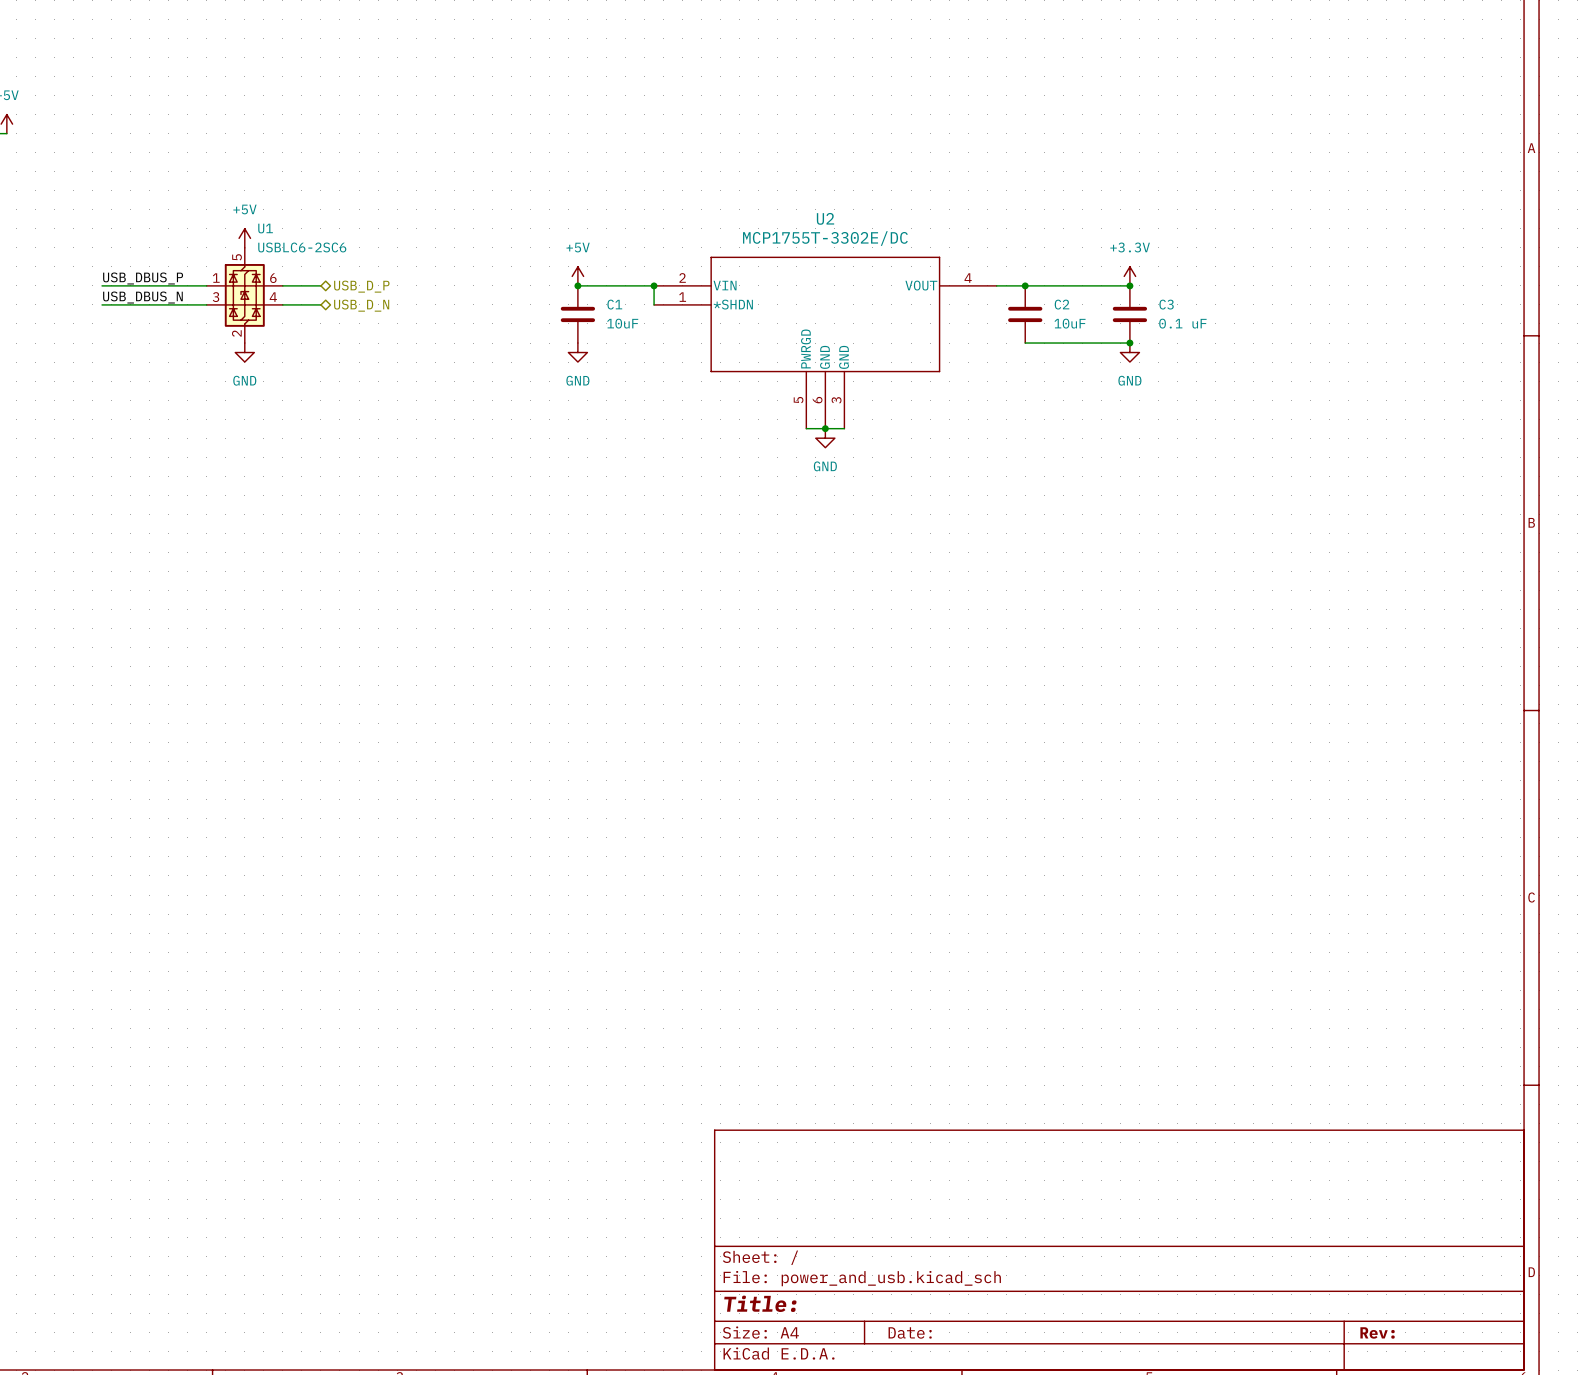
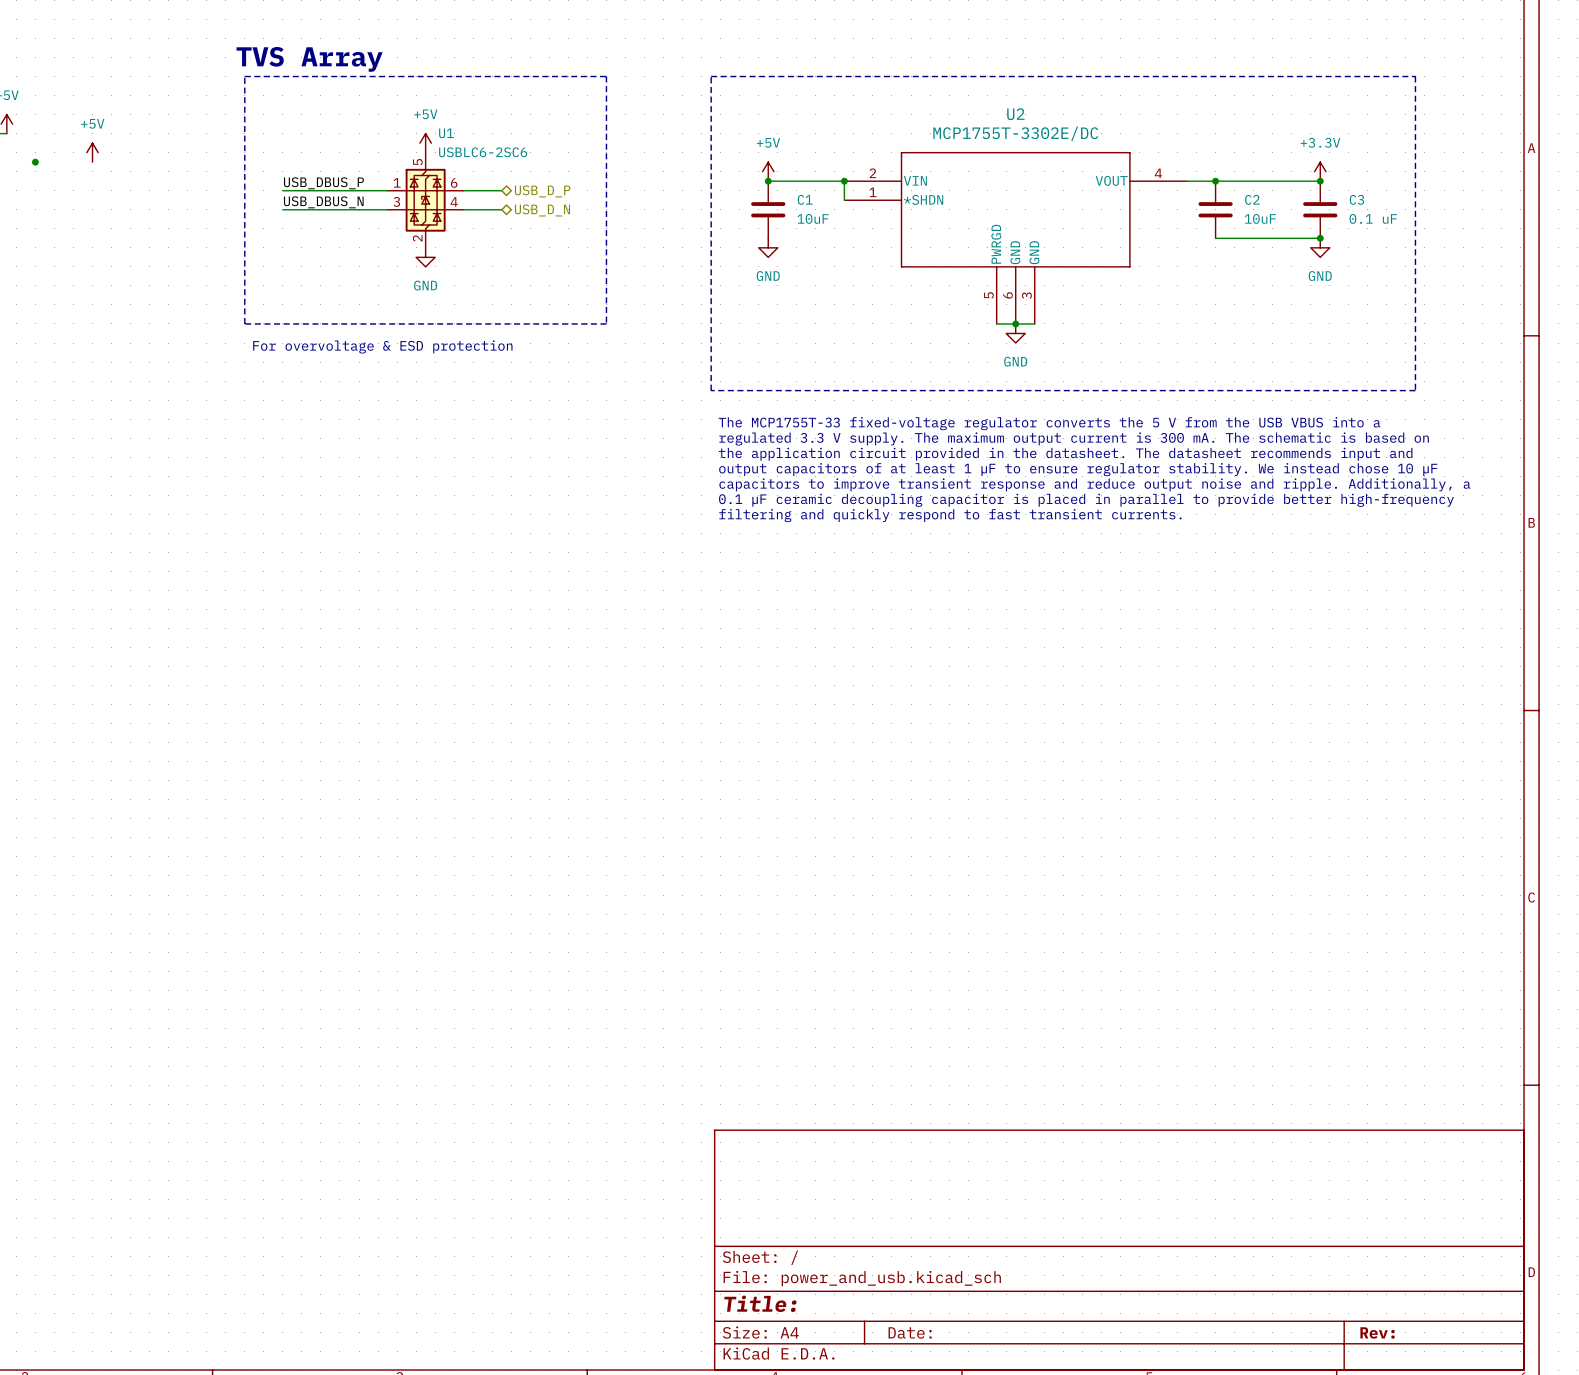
text: none -> TVS Array (309, 59)
line: none -> (244, 76) (606, 76) (606, 323) (244, 323) (244, 76)
line: none -> (711, 76) (1415, 76) (1415, 390) (711, 390) (711, 76)
power symbol: none -> +5V (425, 143)
power symbol: none -> +5V (92, 152)
junction: none -> (35, 162)
power symbol: none -> +5V (768, 171)
power symbol: none -> +3.3V (1320, 171)
wire: none -> (768, 181) (844, 181) (844, 200)
junction: none -> (768, 181)
junction: none -> (844, 181)
wire: none -> (1187, 181) (1320, 181)
junction: none -> (1215, 181)
junction: none -> (1320, 181)
label: none -> USB_DBUS_P (323, 183)
wire: none -> (282, 190) (387, 190)
wire: none -> (463, 190) (501, 190)
hierarchical label: none -> USB_D_P (542, 191)
label: none -> USB_DBUS_N (323, 202)
wire: none -> (282, 209) (387, 209)
wire: none -> (463, 209) (501, 209)
hierarchical label: none -> USB_D_N (542, 210)
power symbol: +5V (244, 238) -> none
wire: none -> (1215, 238) (1320, 238)
junction: none -> (1320, 238)
power symbol: none -> GND (768, 247)
power symbol: none -> GND (1320, 247)
power symbol: none -> GND (425, 257)
power symbol: +5V (577, 276) -> none
power symbol: +3.3V (1129, 276) -> none
label: USB_DBUS_P (143, 278) -> none
wire: (102, 285) (206, 285) -> none
wire: (282, 285) (320, 285) -> none
wire: (577, 285) (654, 285) (654, 304) -> none
junction: (577, 285) -> none
junction: (654, 285) -> none
wire: (996, 285) (1129, 285) -> none
junction position: (1025, 285) -> (1015, 323)
junction: (1129, 285) -> none
hierarchical label: USB_D_P (361, 286) -> none
U1 position: (244, 295) -> (425, 200)
label: USB_DBUS_N (142, 297) -> none
wire: (102, 304) (206, 304) -> none
wire: (282, 304) (320, 304) -> none
hierarchical label: USB_D_N (361, 305) -> none
C1 position: (577, 314) -> (768, 209)
C2 position: (1025, 314) -> (1215, 209)
C3 position: (1129, 314) -> (1320, 209)
wire: none -> (996, 323) (1034, 323)
power symbol: none -> GND (1015, 333)
U2 position: (825, 342) -> (1015, 238)
wire: (1025, 343) (1129, 343) -> none
junction: (1129, 343) -> none
text: none -> For overvoltage & ESD protection (382, 346)
power symbol: GND (244, 352) -> none
power symbol: GND (577, 352) -> none
power symbol: GND (1129, 352) -> none
text: none -> The MCP1755T-33 fixed-voltage regulator converts the 5 V from the USB VBUS into a (1049, 423)
wire: (806, 428) (844, 428) -> none
junction: (825, 428) -> none
power symbol: GND (825, 438) -> none
text: none -> regulated 3.3 V supply. The maximum output current is 300 mA. The schematic is based on (1074, 438)
text: none -> the application circuit provided in the datasheet. The datasheet recommends input and (1065, 454)
text: none -> output capacitors of at least 1 µF to ensure regulator stability. We instead chose 10 µF (1078, 469)
text: none -> capacitors to improve transient response and reduce output noise and ripple. Additionally, a (1094, 484)
text: none -> 0.1 µF ceramic decoupling capacitor is placed in parallel to provide better high-frequency (1086, 500)
text: none -> filtering and quickly respond to fast transient currents. (950, 515)

